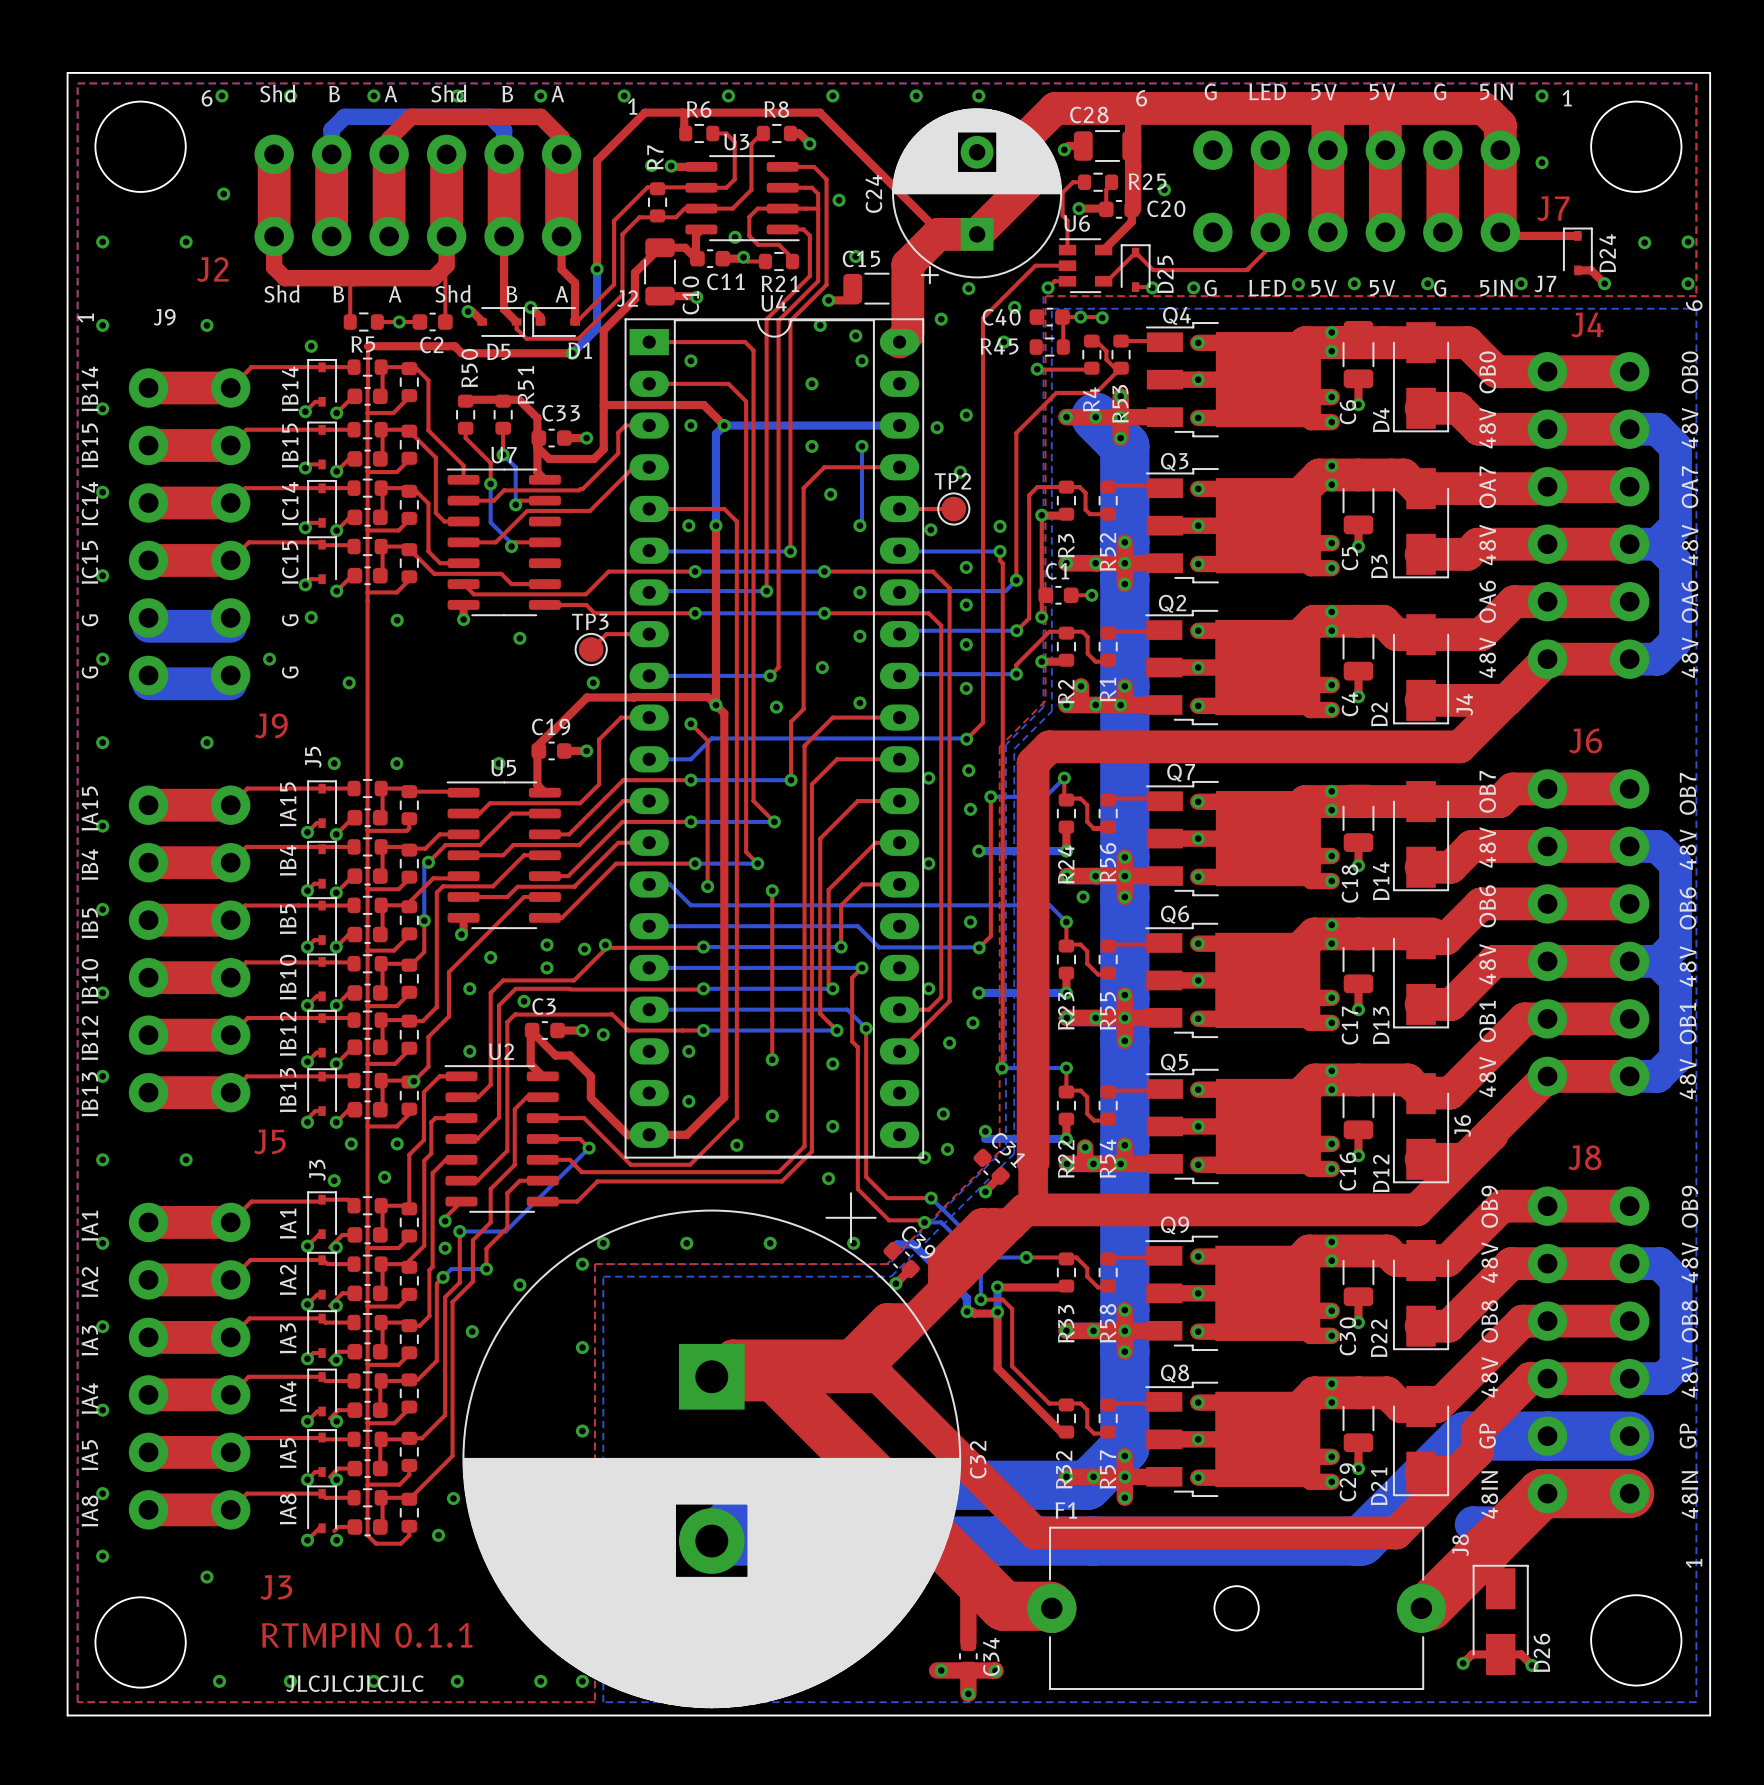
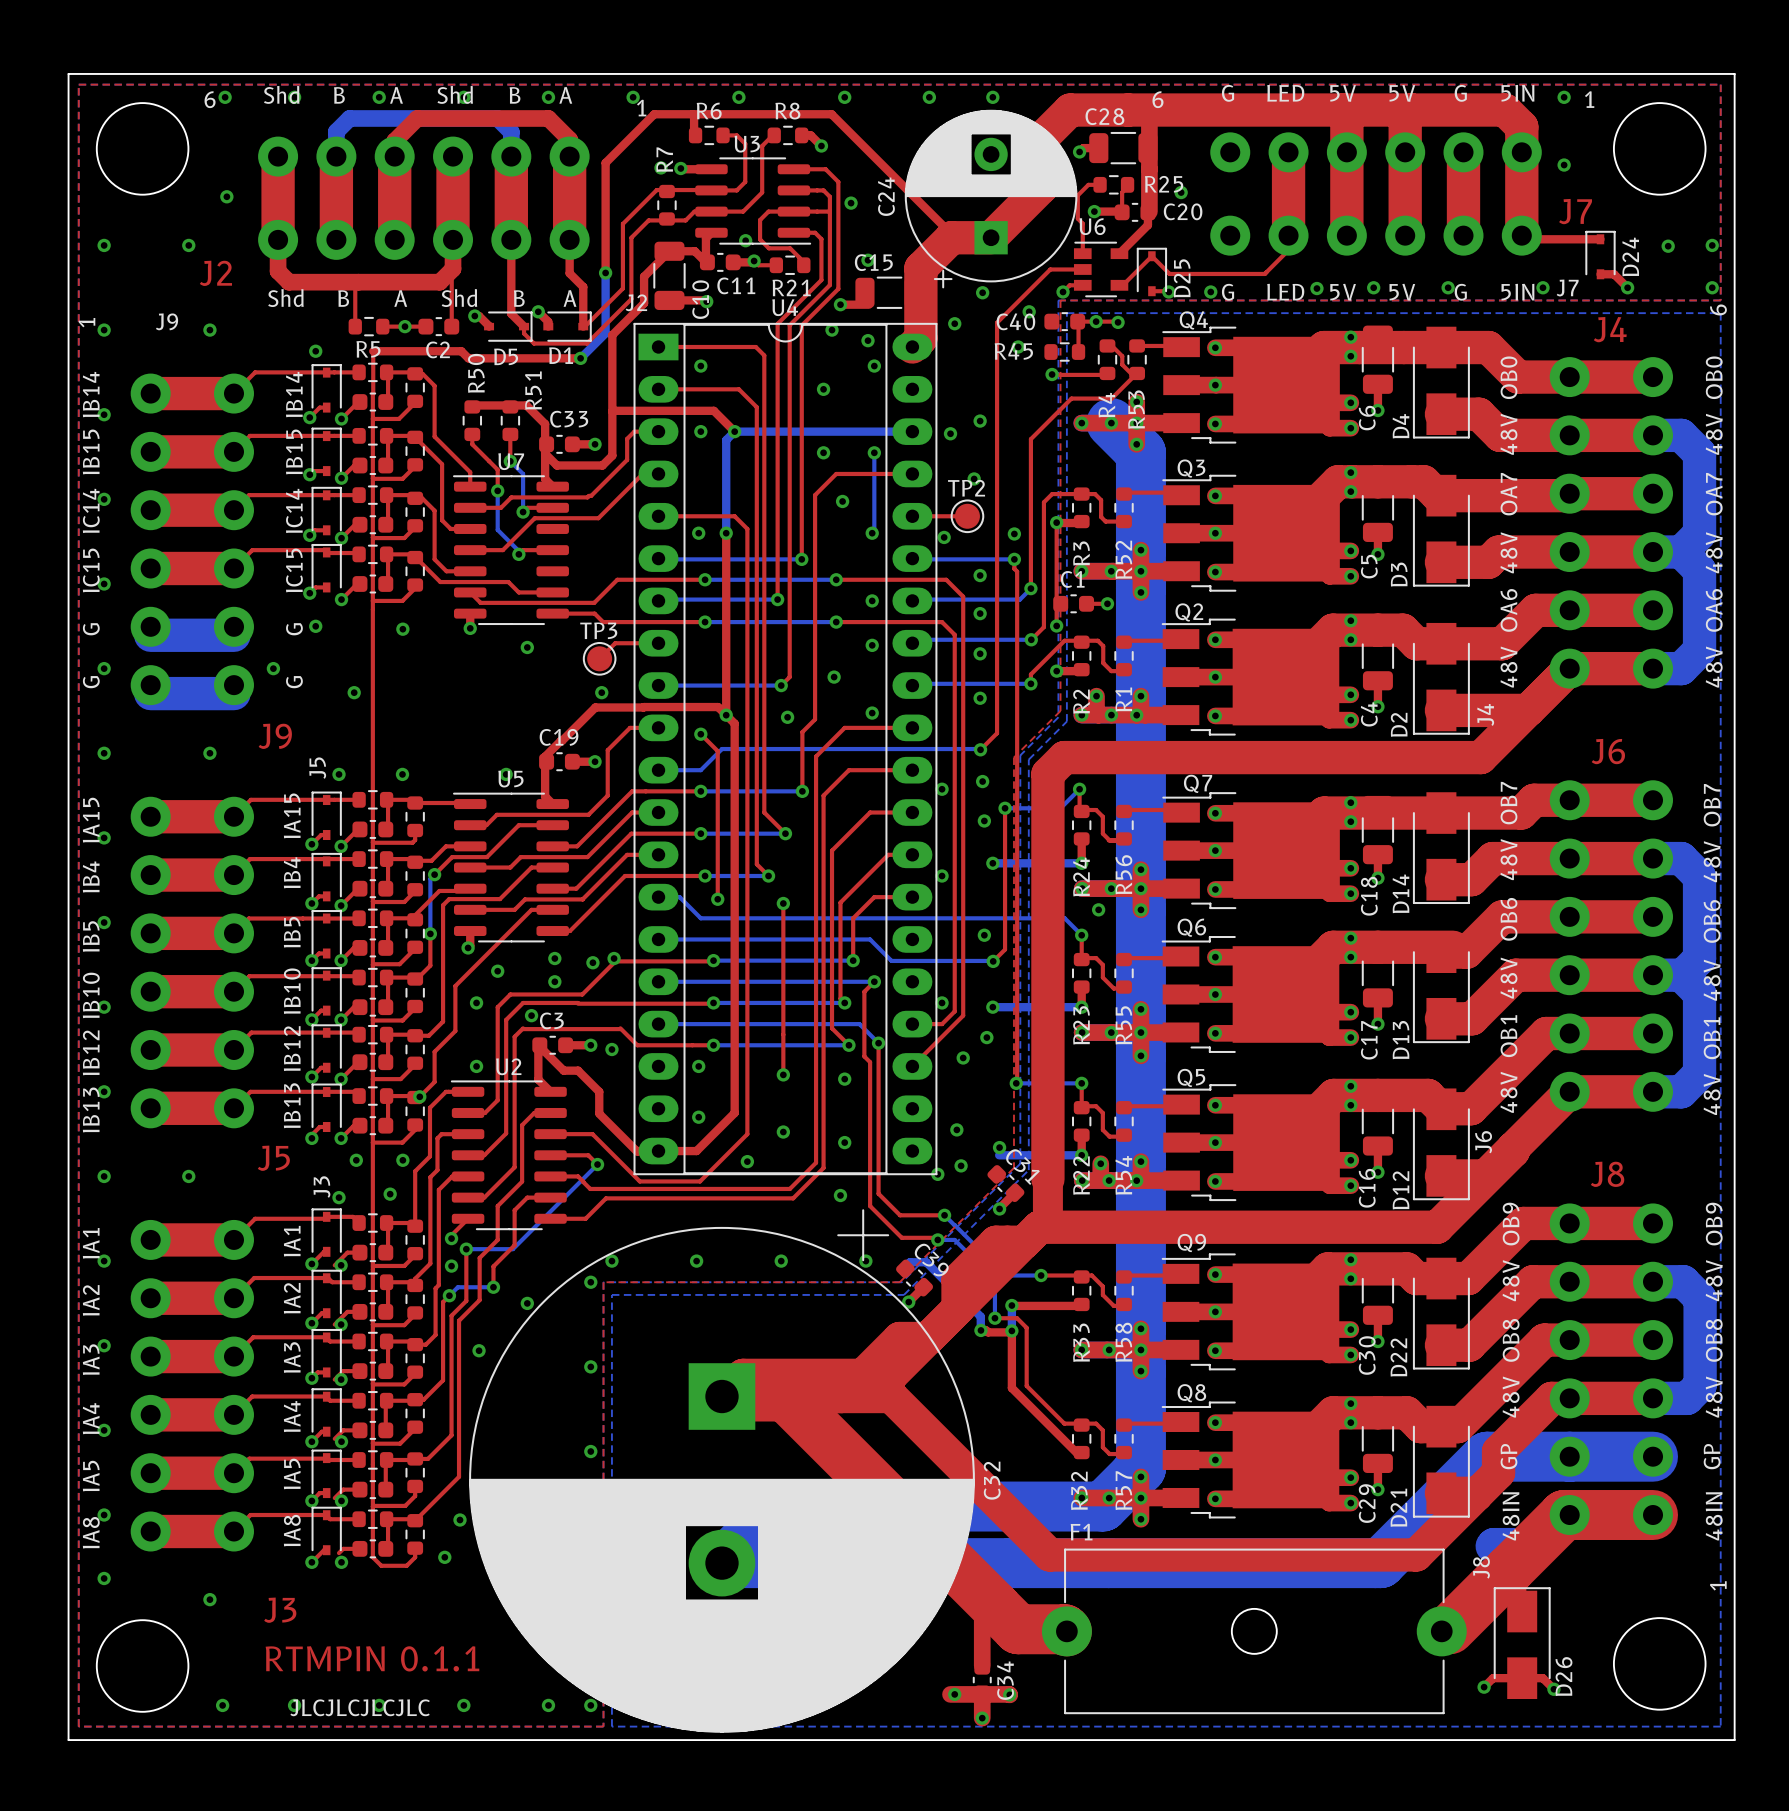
D1 rotation: 0° (556, 322) -> 180° (567, 326)

